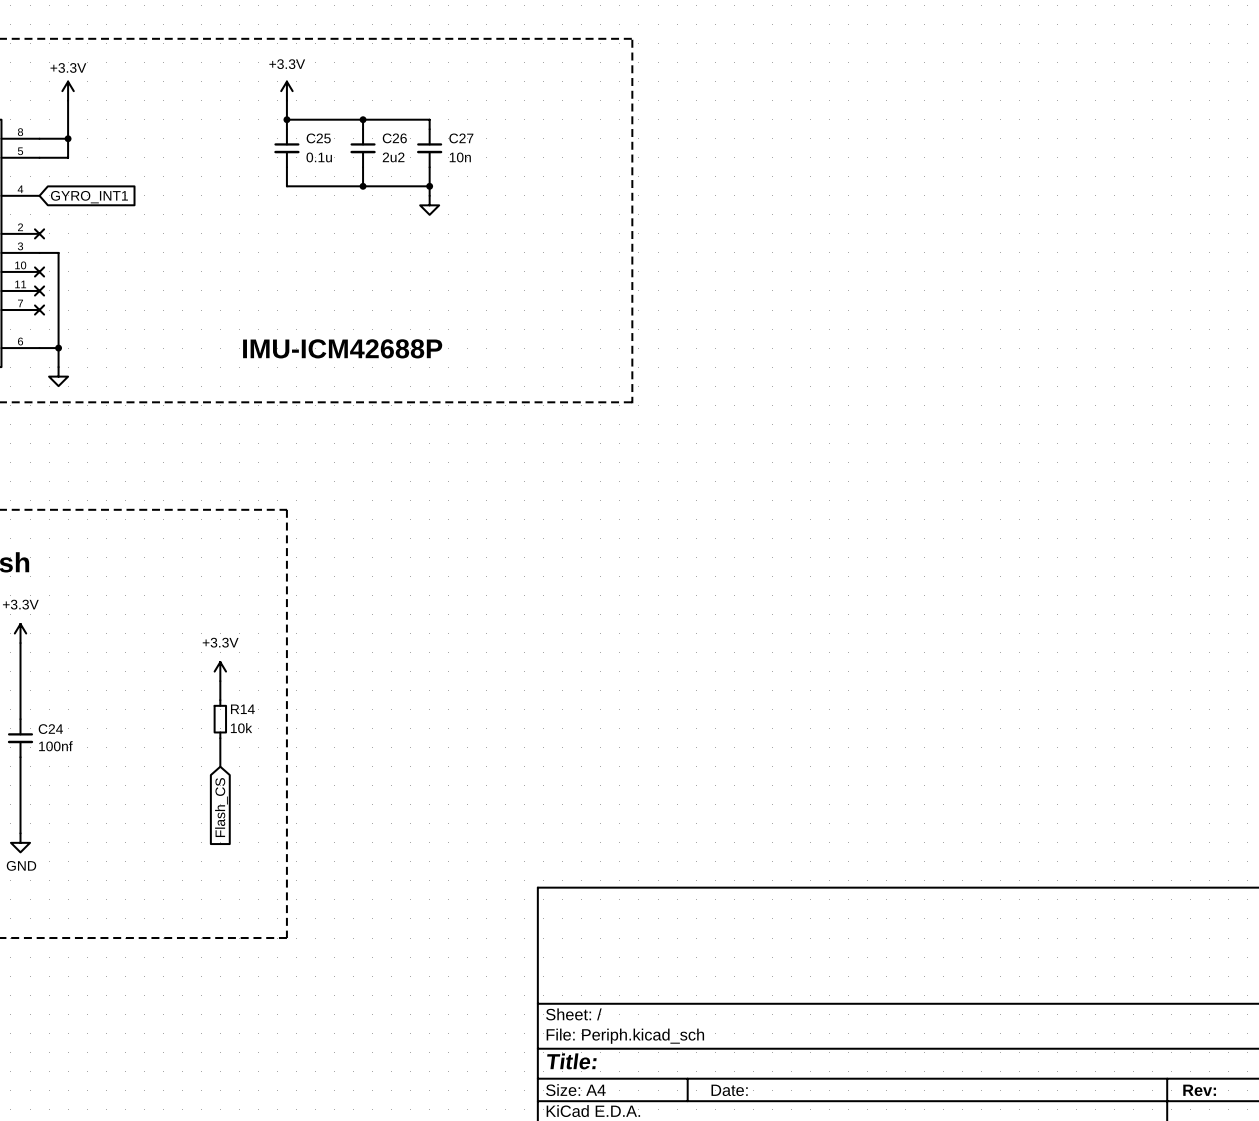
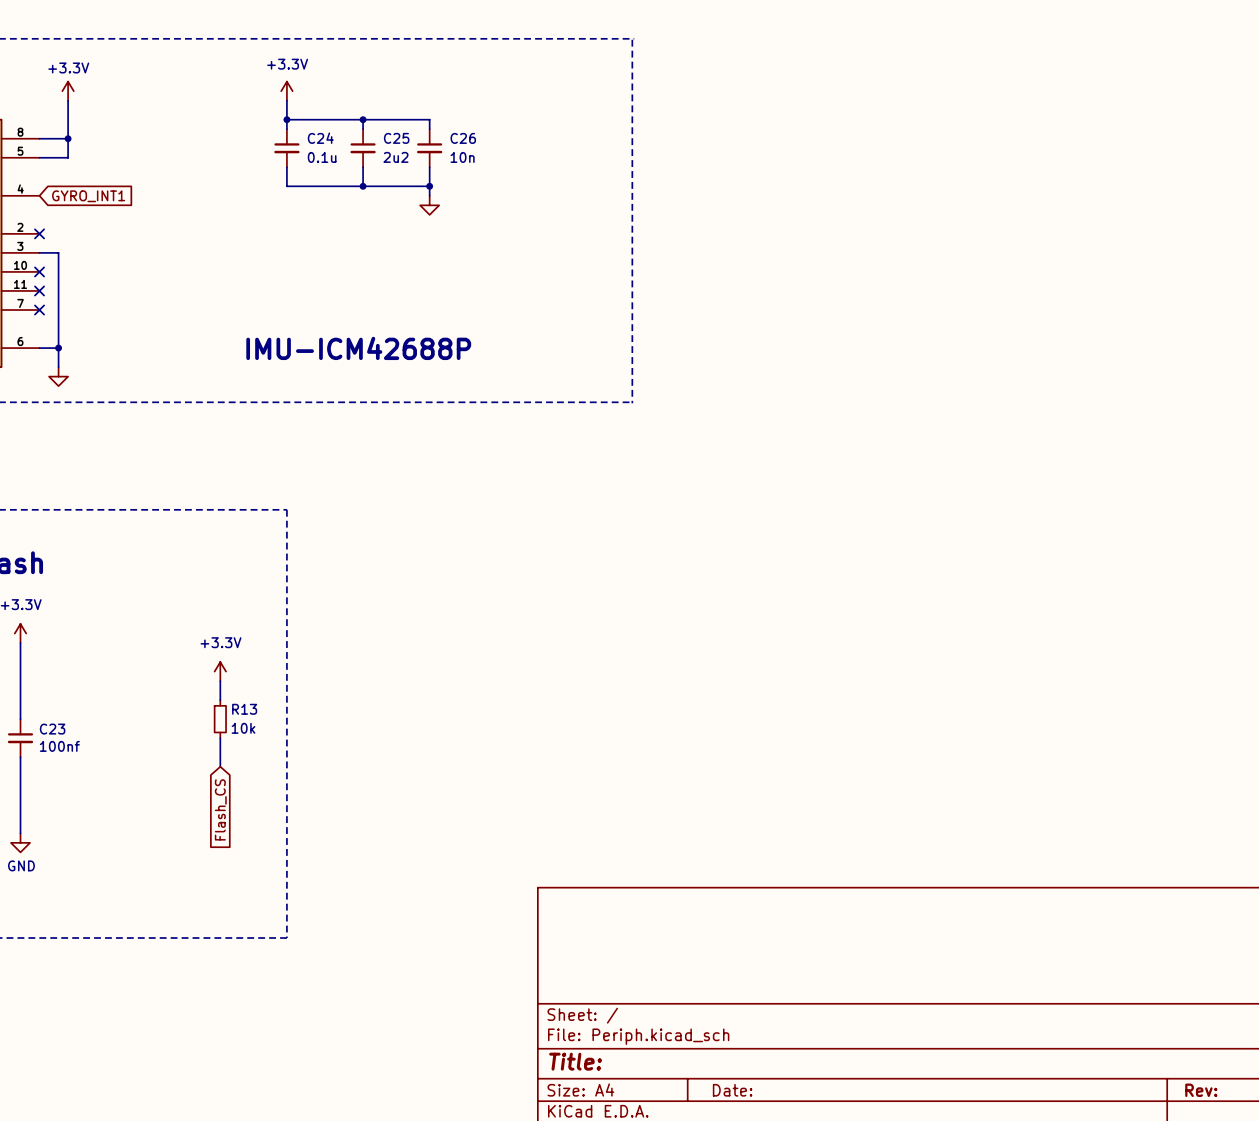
C25 name: C25 (318, 138) -> C24 (320, 138)
C26 name: C26 (394, 138) -> C25 (396, 138)
C27 name: C27 (461, 138) -> C26 (463, 138)
R14 name: R14 (242, 709) -> R13 (244, 709)
C24 name: C24 (50, 729) -> C23 (52, 729)

